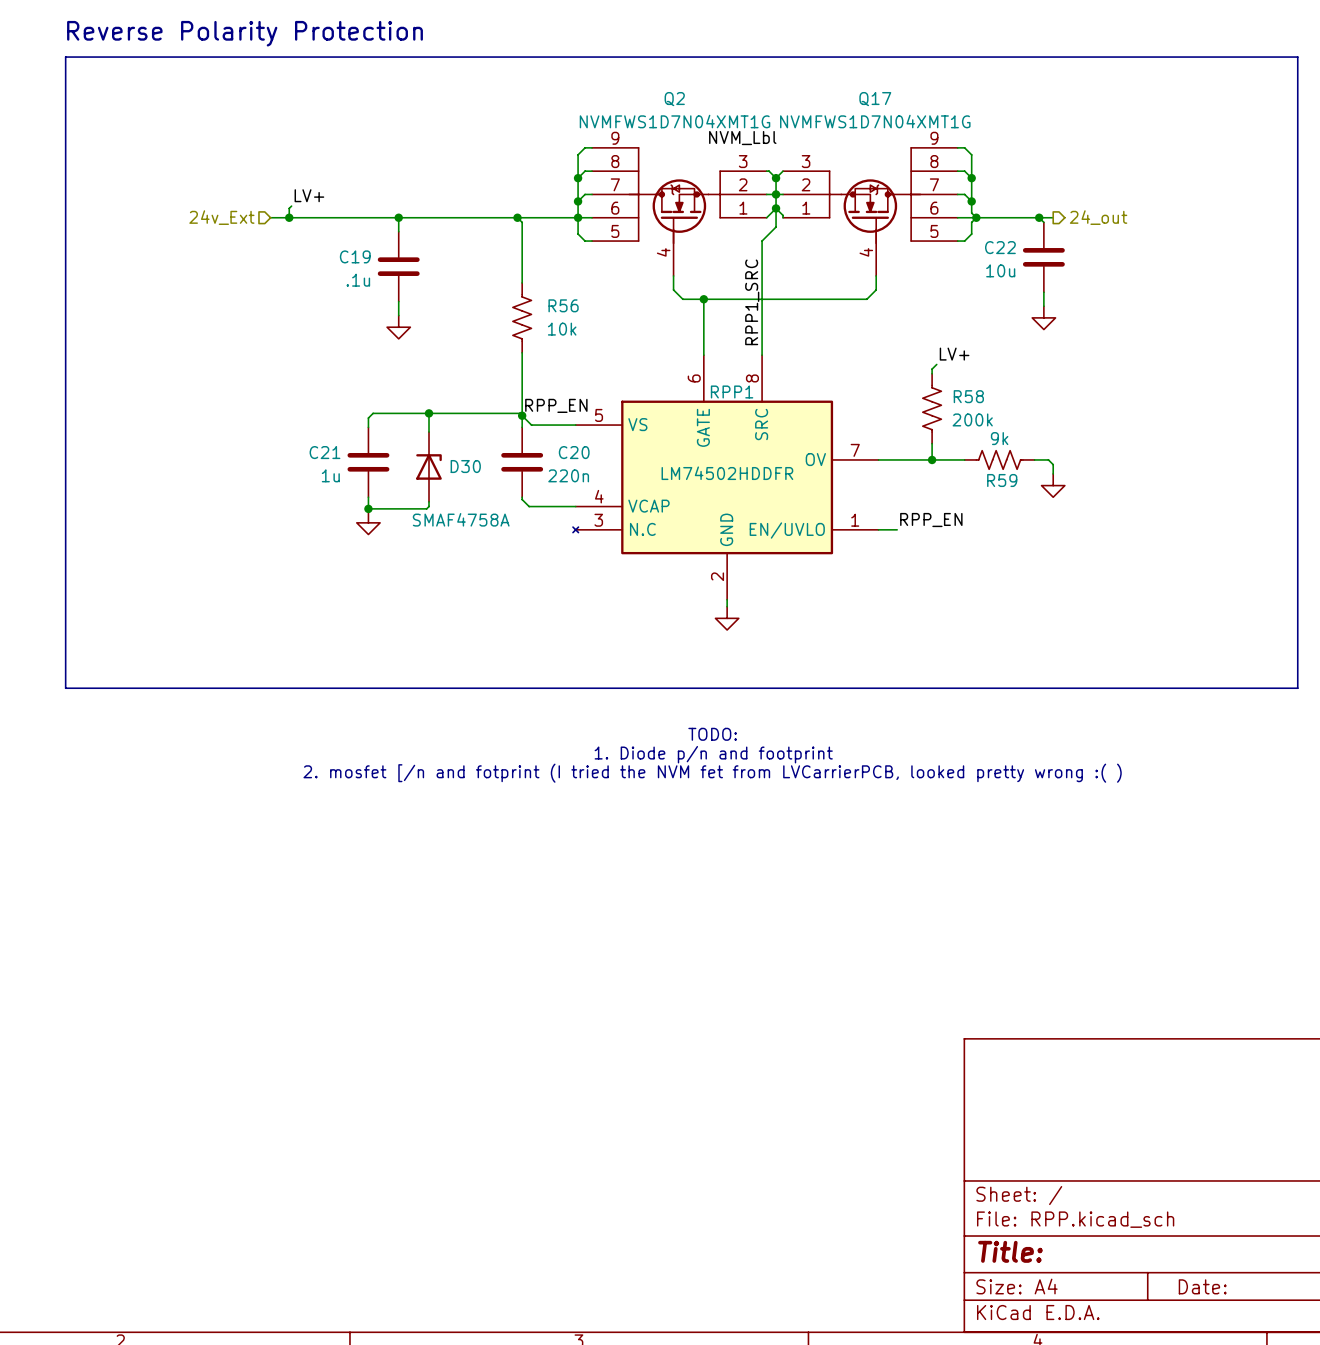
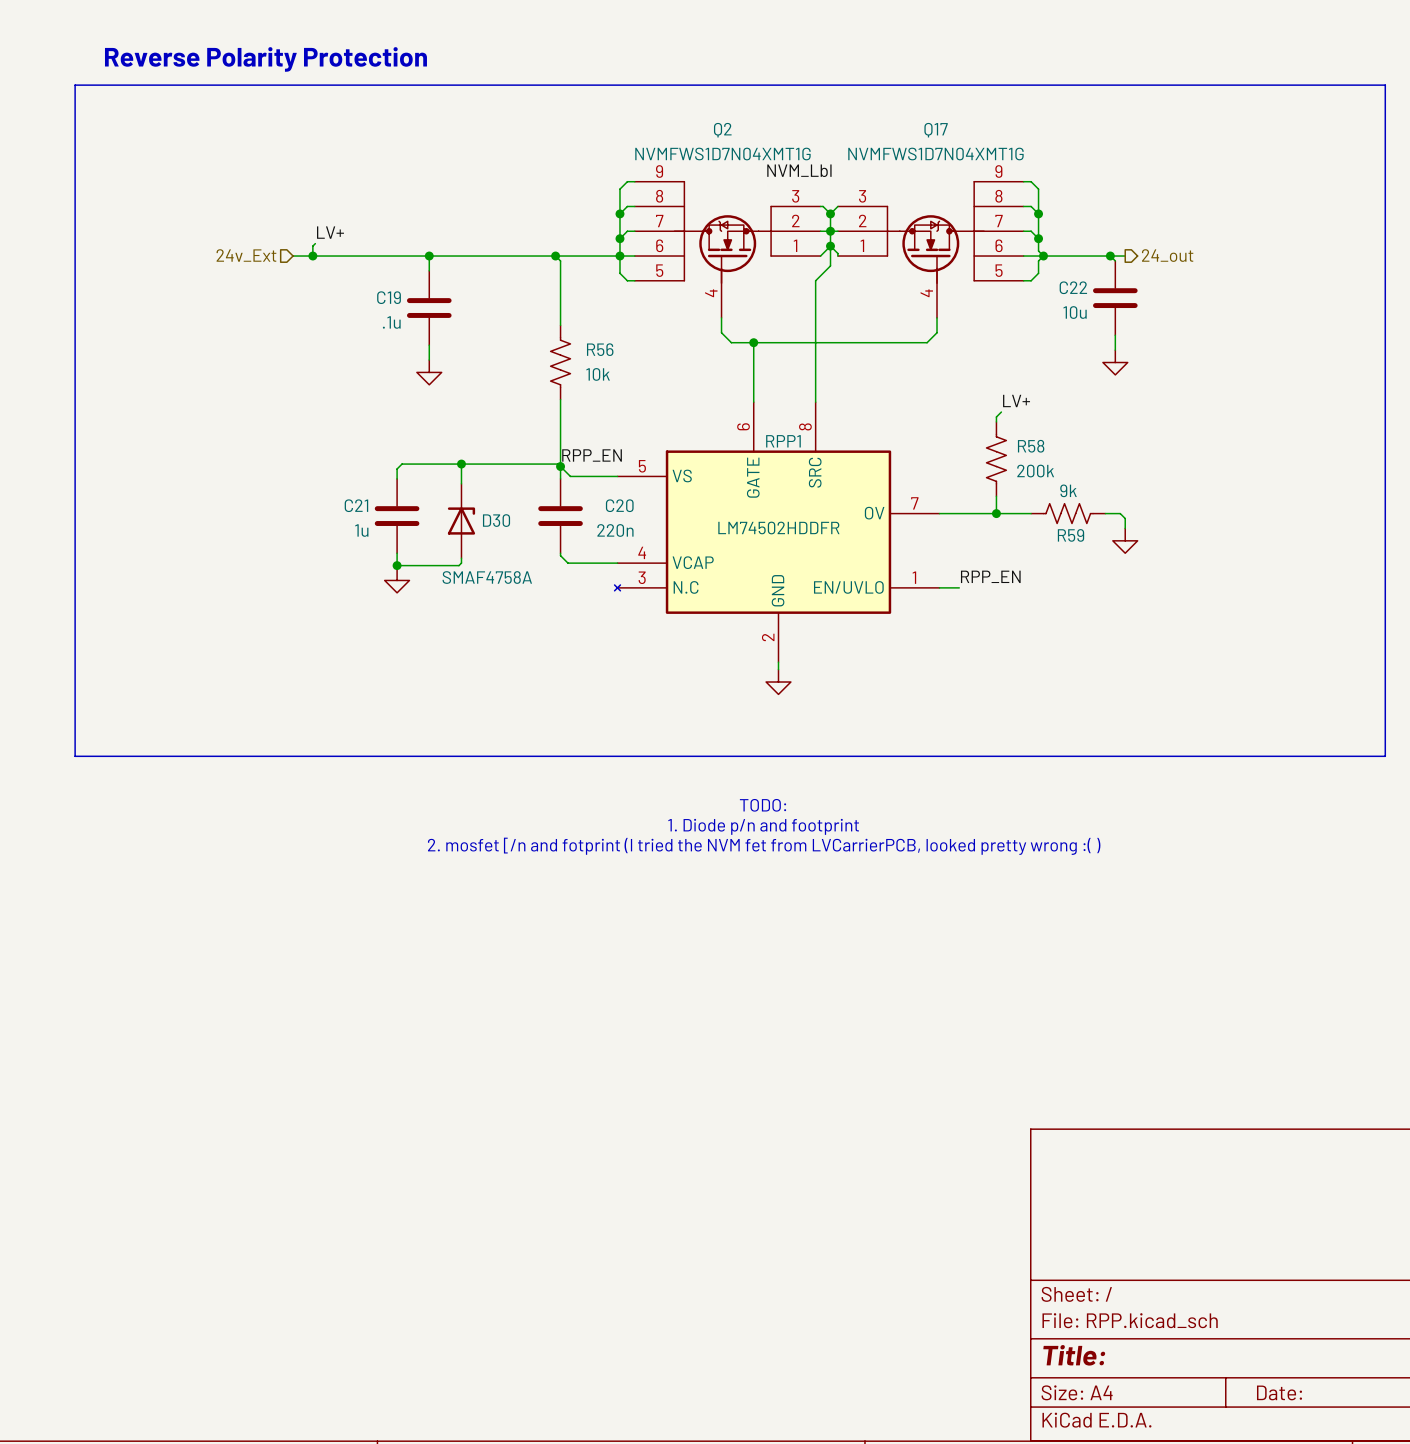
label: RPP1_SRC (752, 302) -> none

